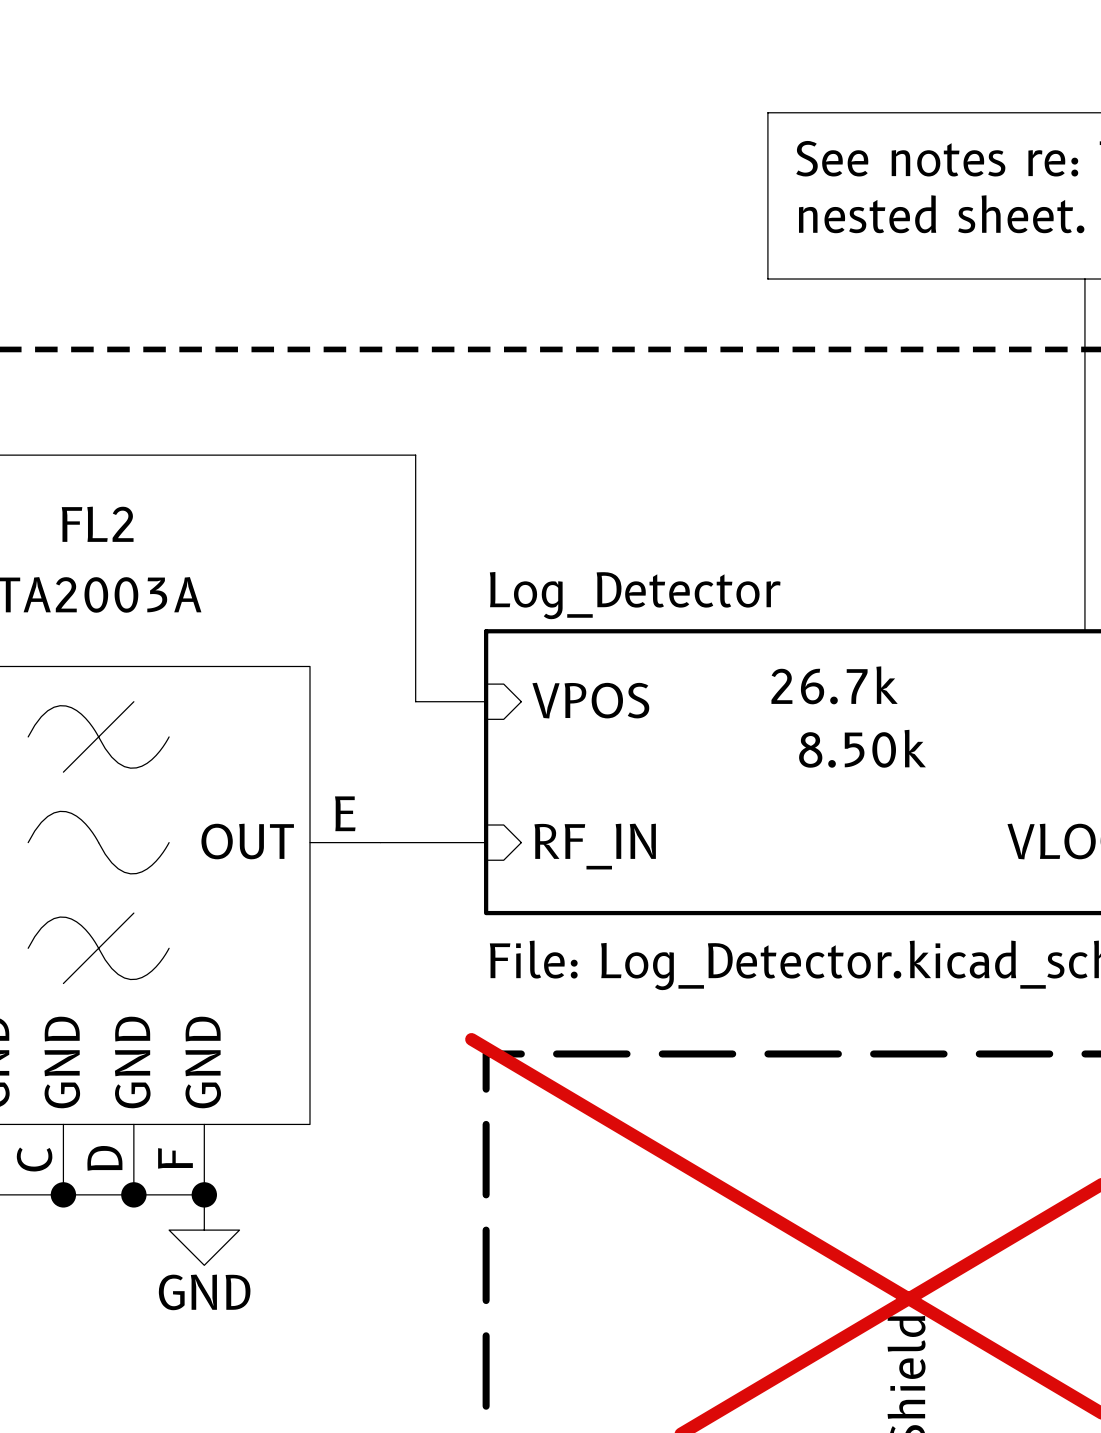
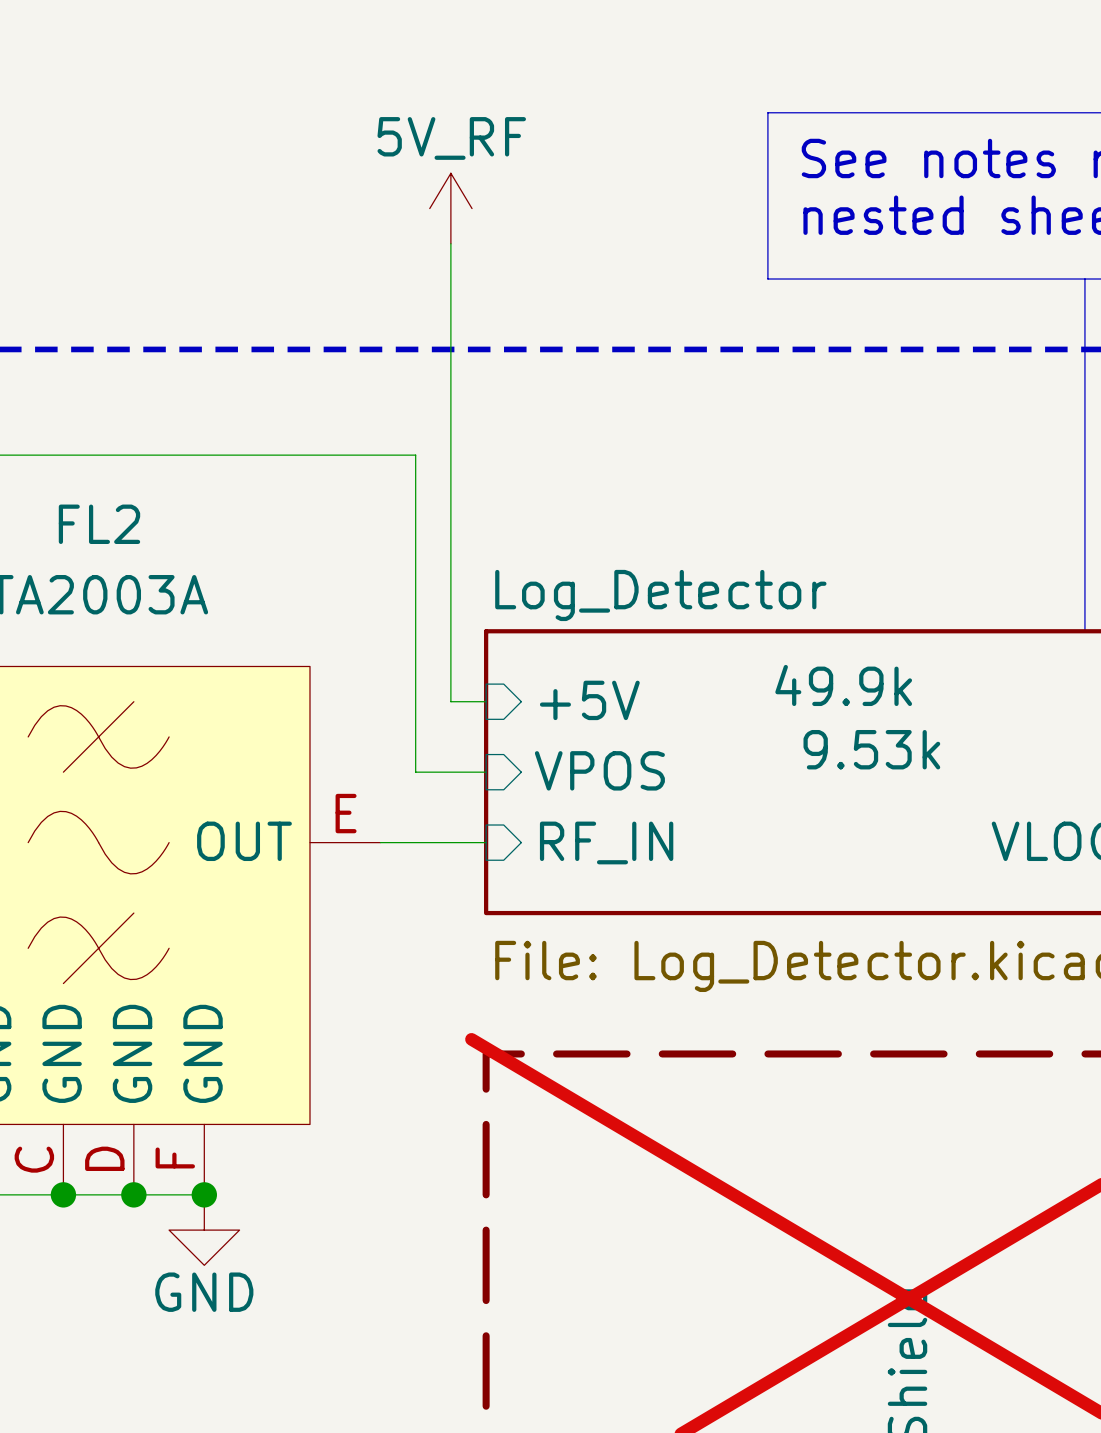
power symbol: none -> 5V_RF (450, 208)
wire: none -> (450, 243) (450, 701)
sheet Log_Detector text: 26.7k (834, 685) -> 49.9k (843, 685)
sheet pin: VPOS (590, 700) -> +5V (589, 700)
wire: (415, 701) (450, 701) -> (415, 701) (415, 772) (486, 772)
sheet Log_Detector text: 8.50k (862, 748) -> 9.53k (871, 749)
sheet pin: none -> VPOS (599, 770)

